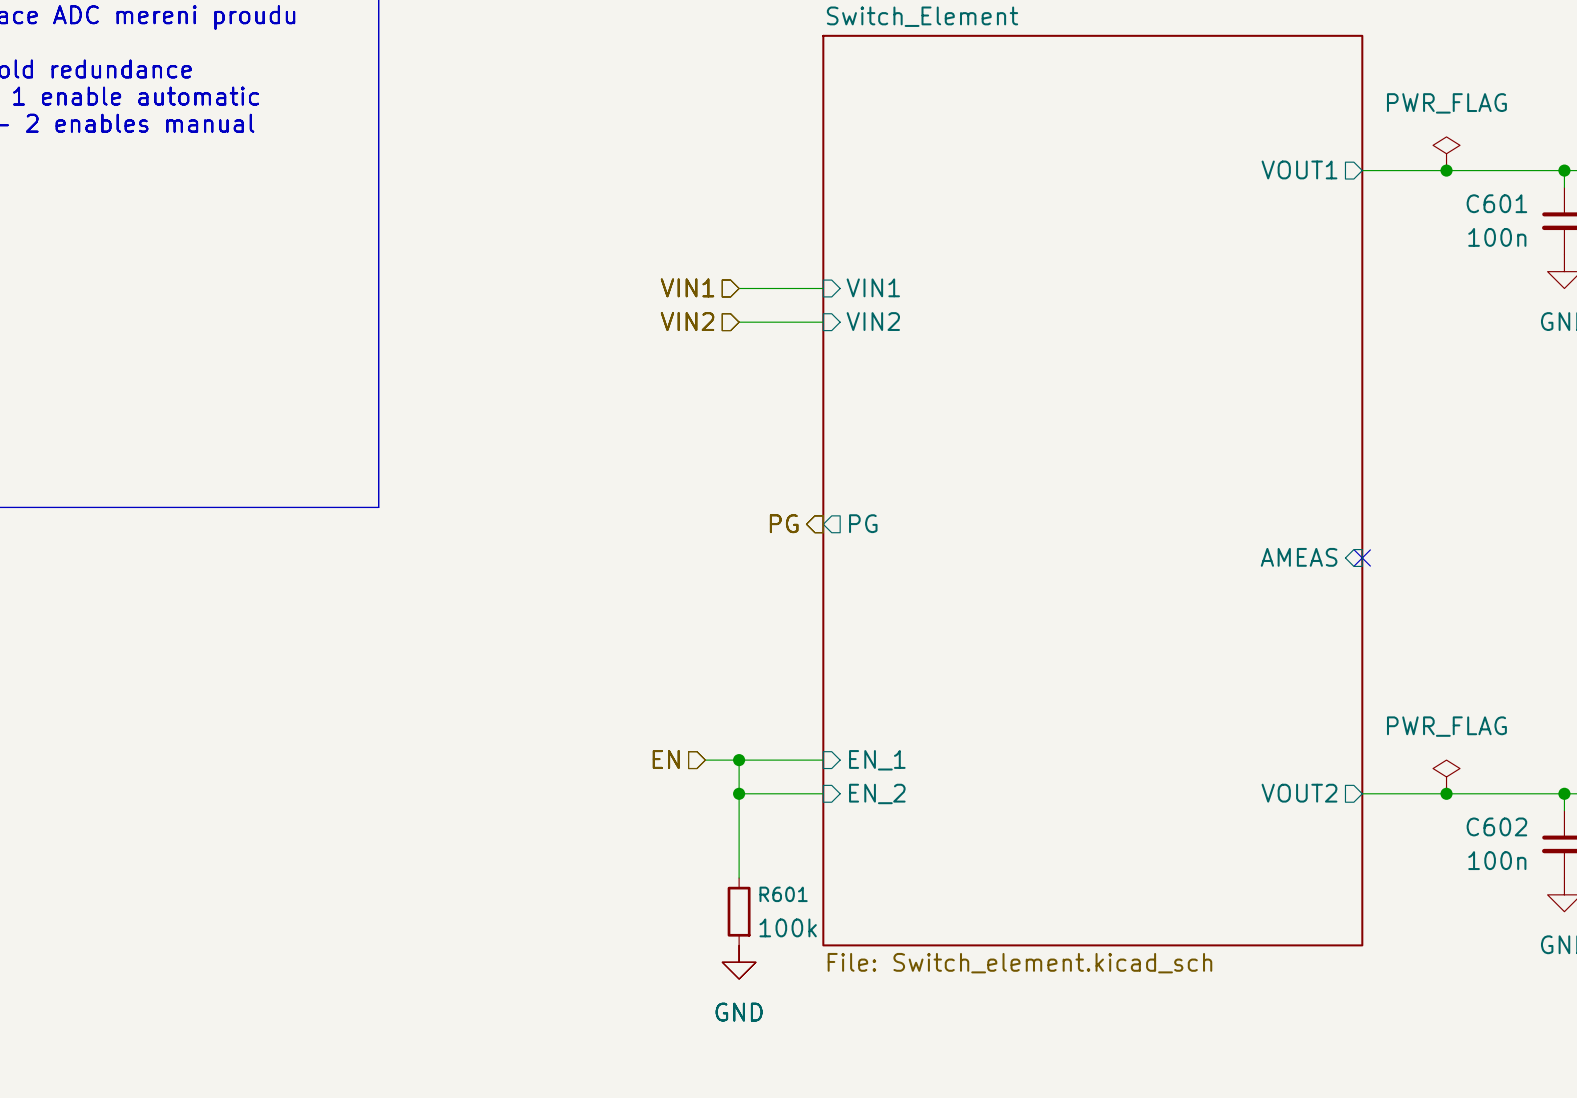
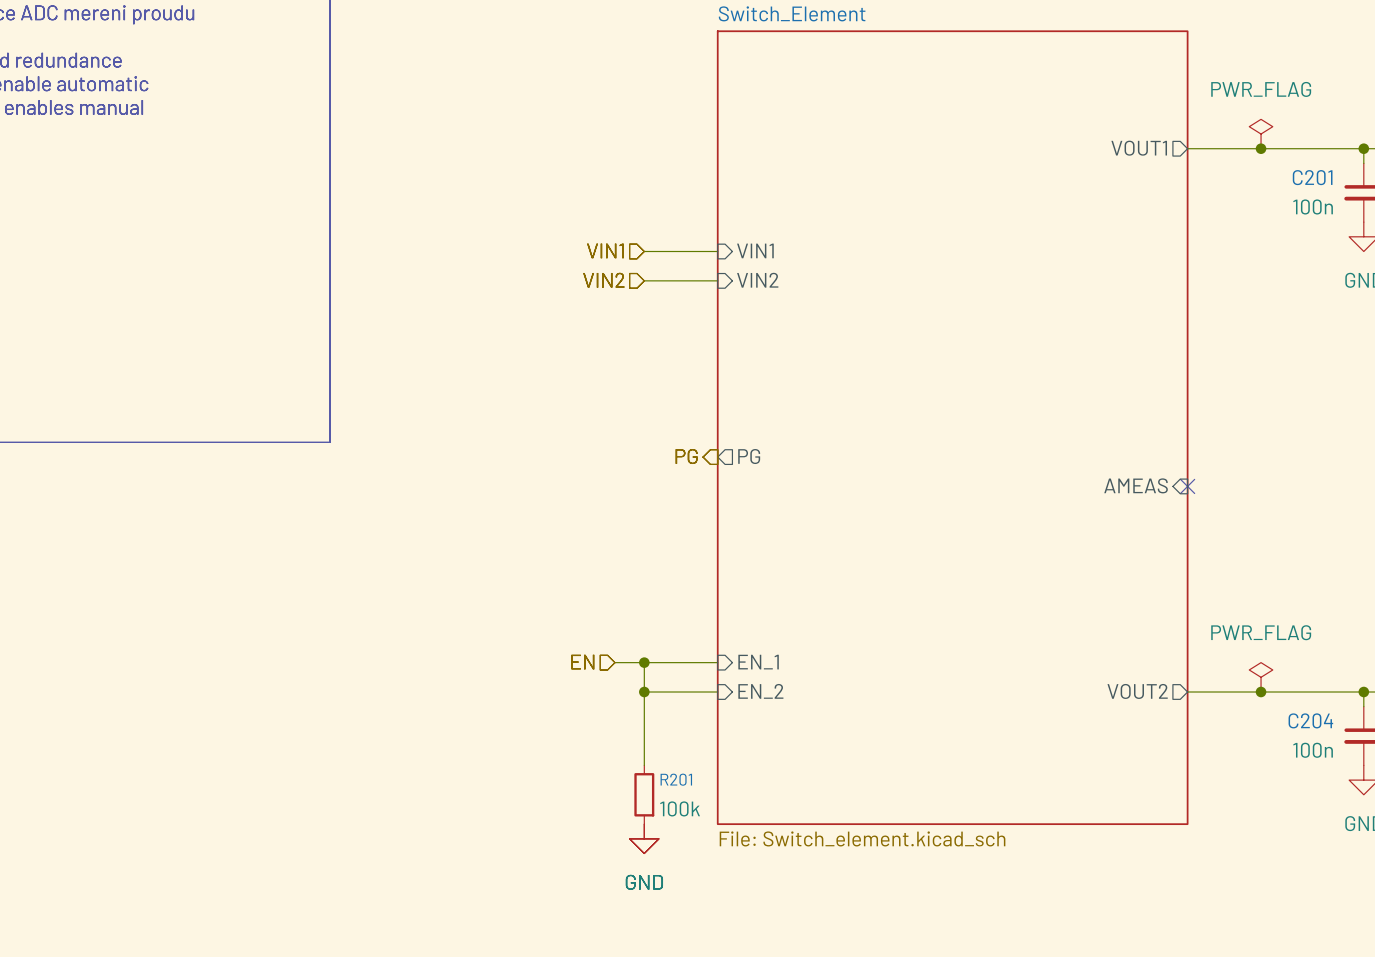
C601 name: C601 (1496, 203) -> C201 (1312, 177)
C602 name: C602 (1496, 826) -> C204 (1310, 720)
R601 name: R601 (783, 894) -> R201 (676, 779)

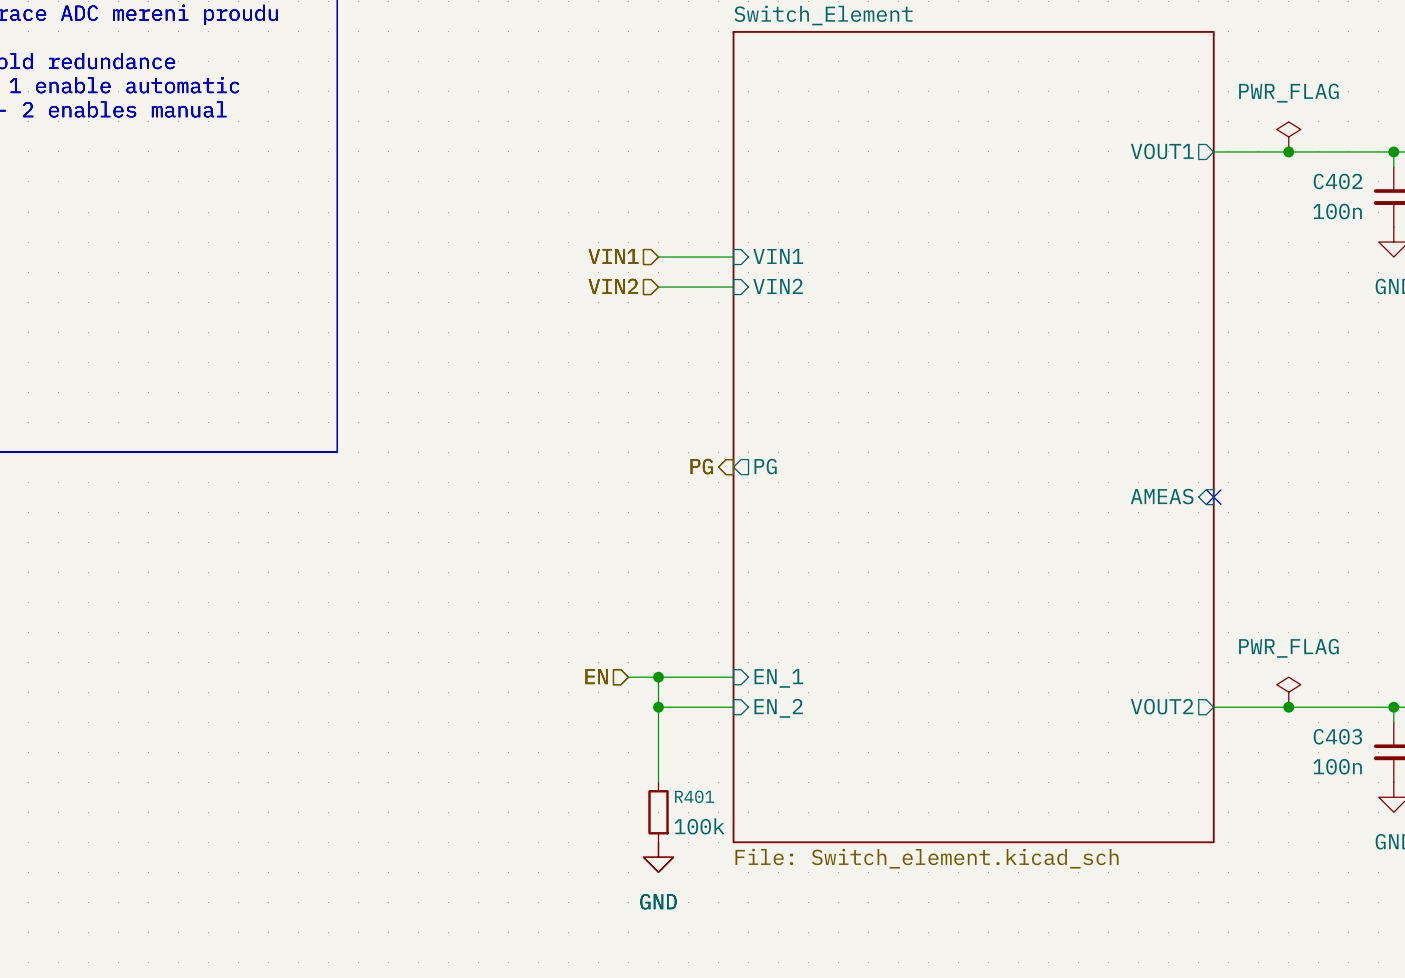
C201 name: C201 (1312, 177) -> C402 (1338, 181)
C204 name: C204 (1310, 720) -> C403 (1337, 736)
R201 name: R201 (676, 779) -> R401 (694, 796)

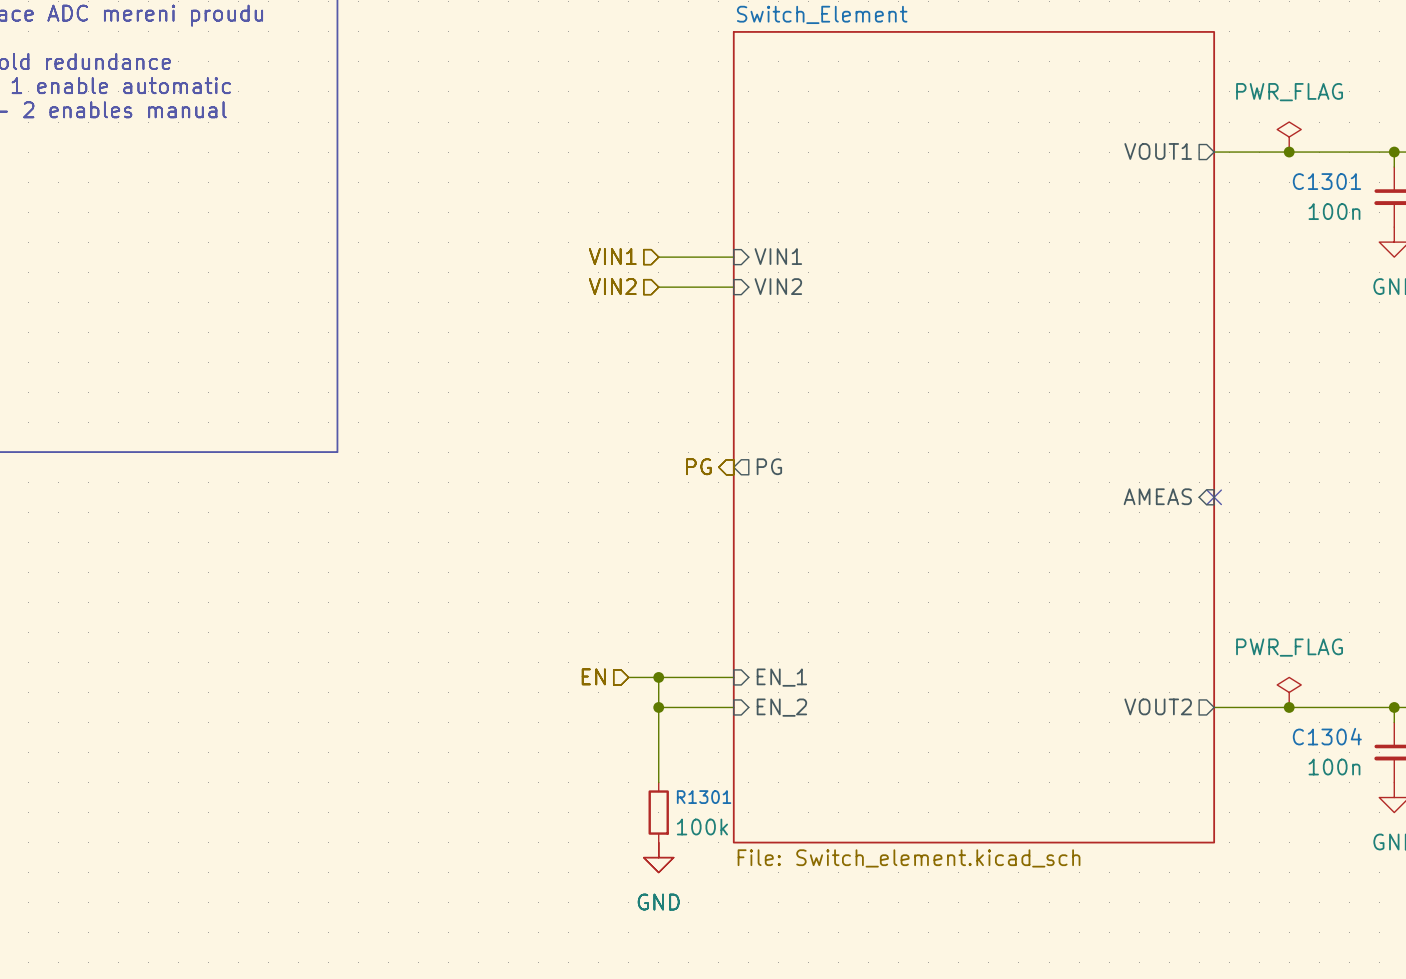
C402 name: C402 (1338, 181) -> C1301 (1326, 181)
C403 name: C403 (1337, 736) -> C1304 (1327, 736)
R401 name: R401 (694, 796) -> R1301 (704, 797)

